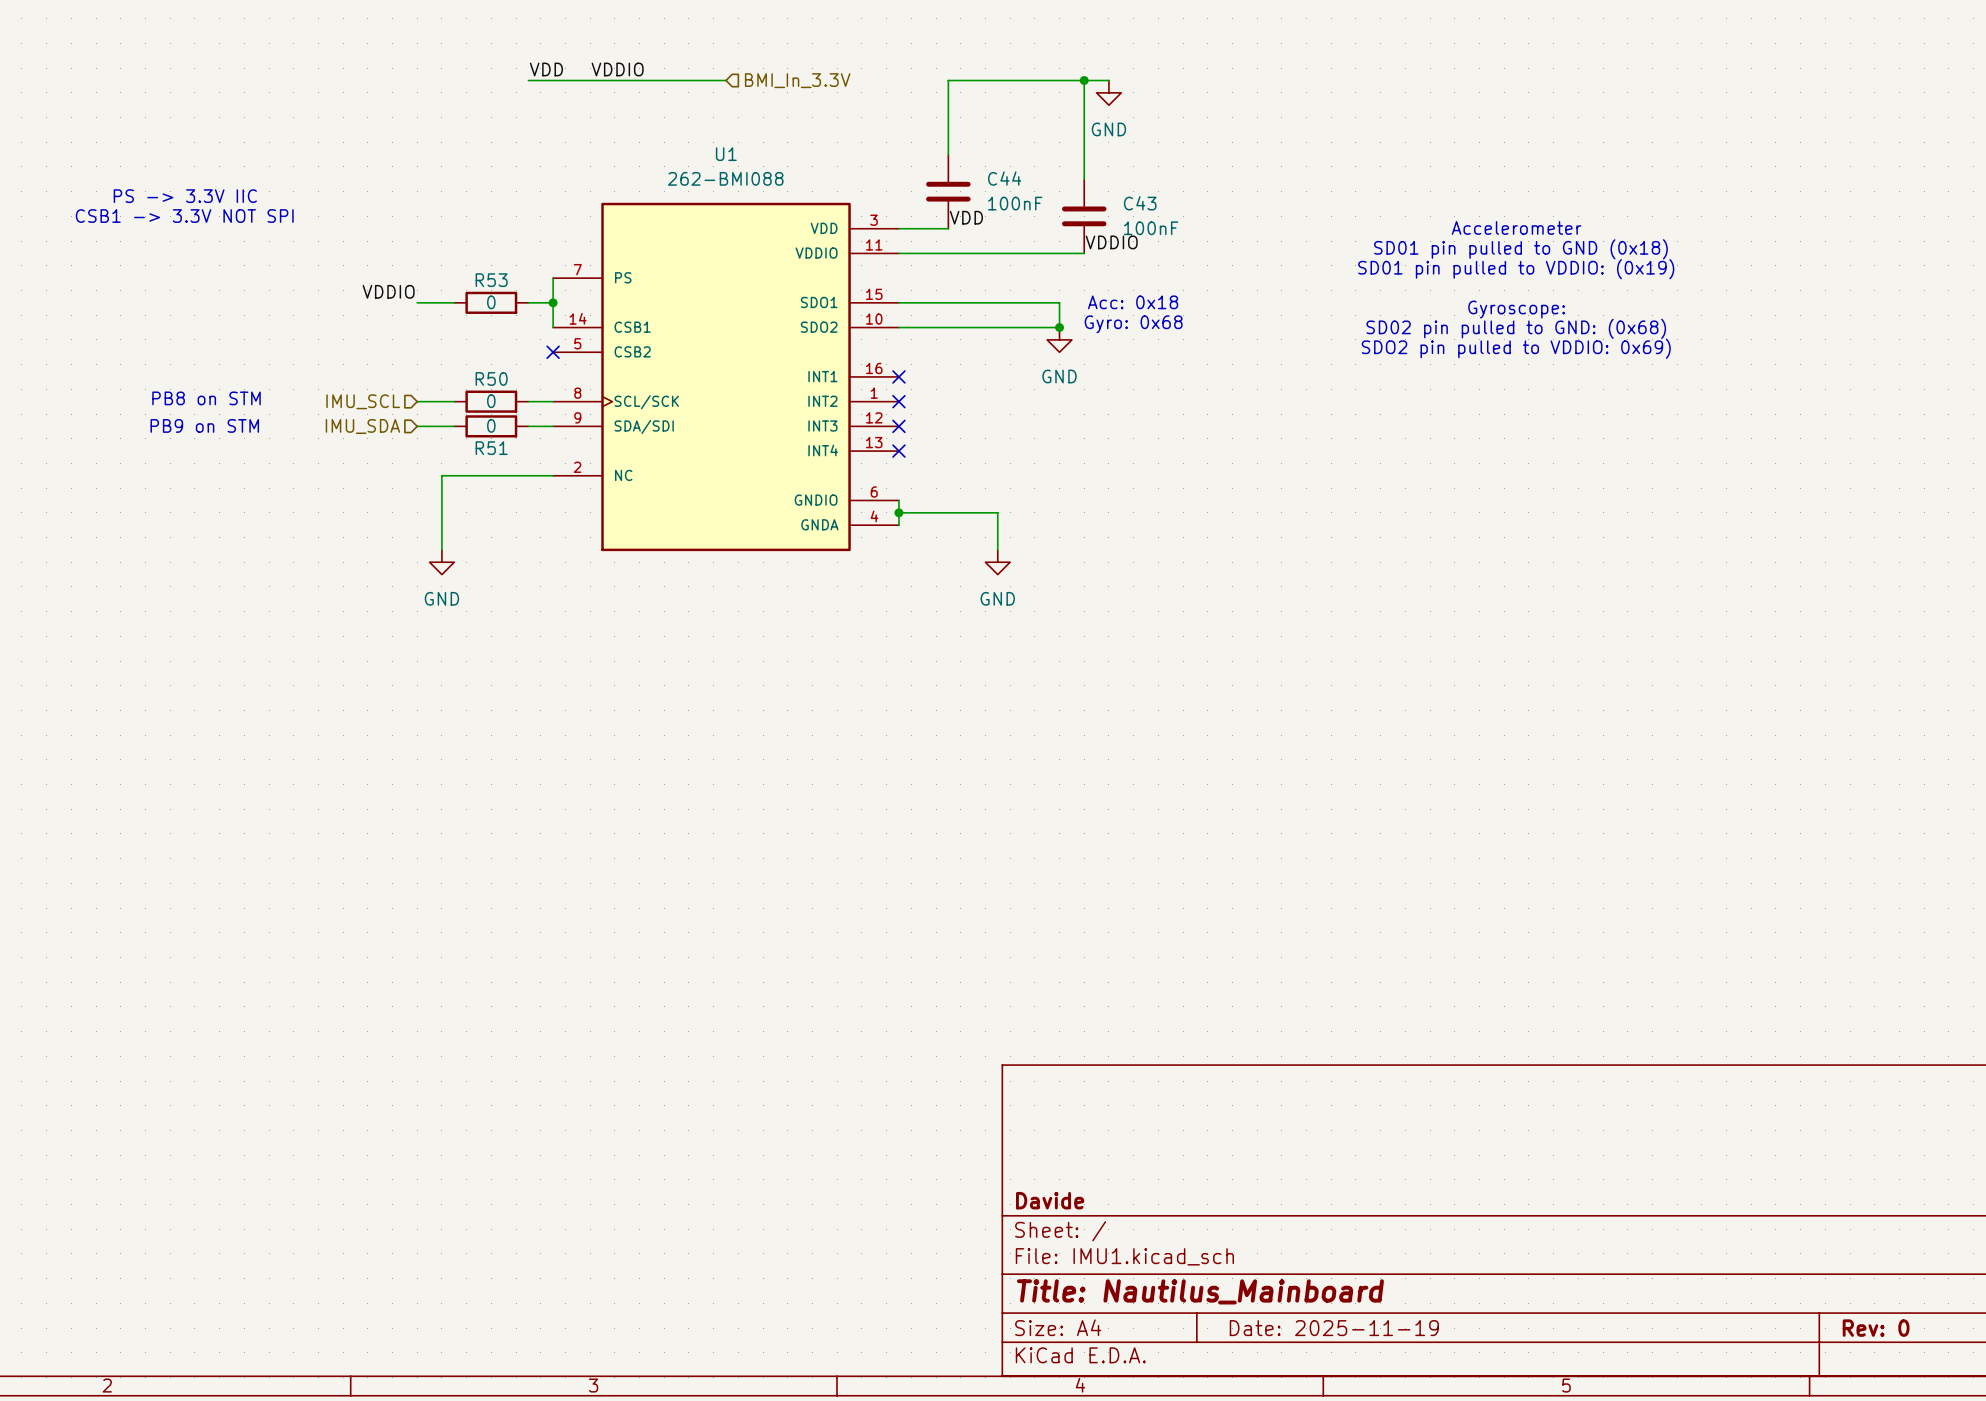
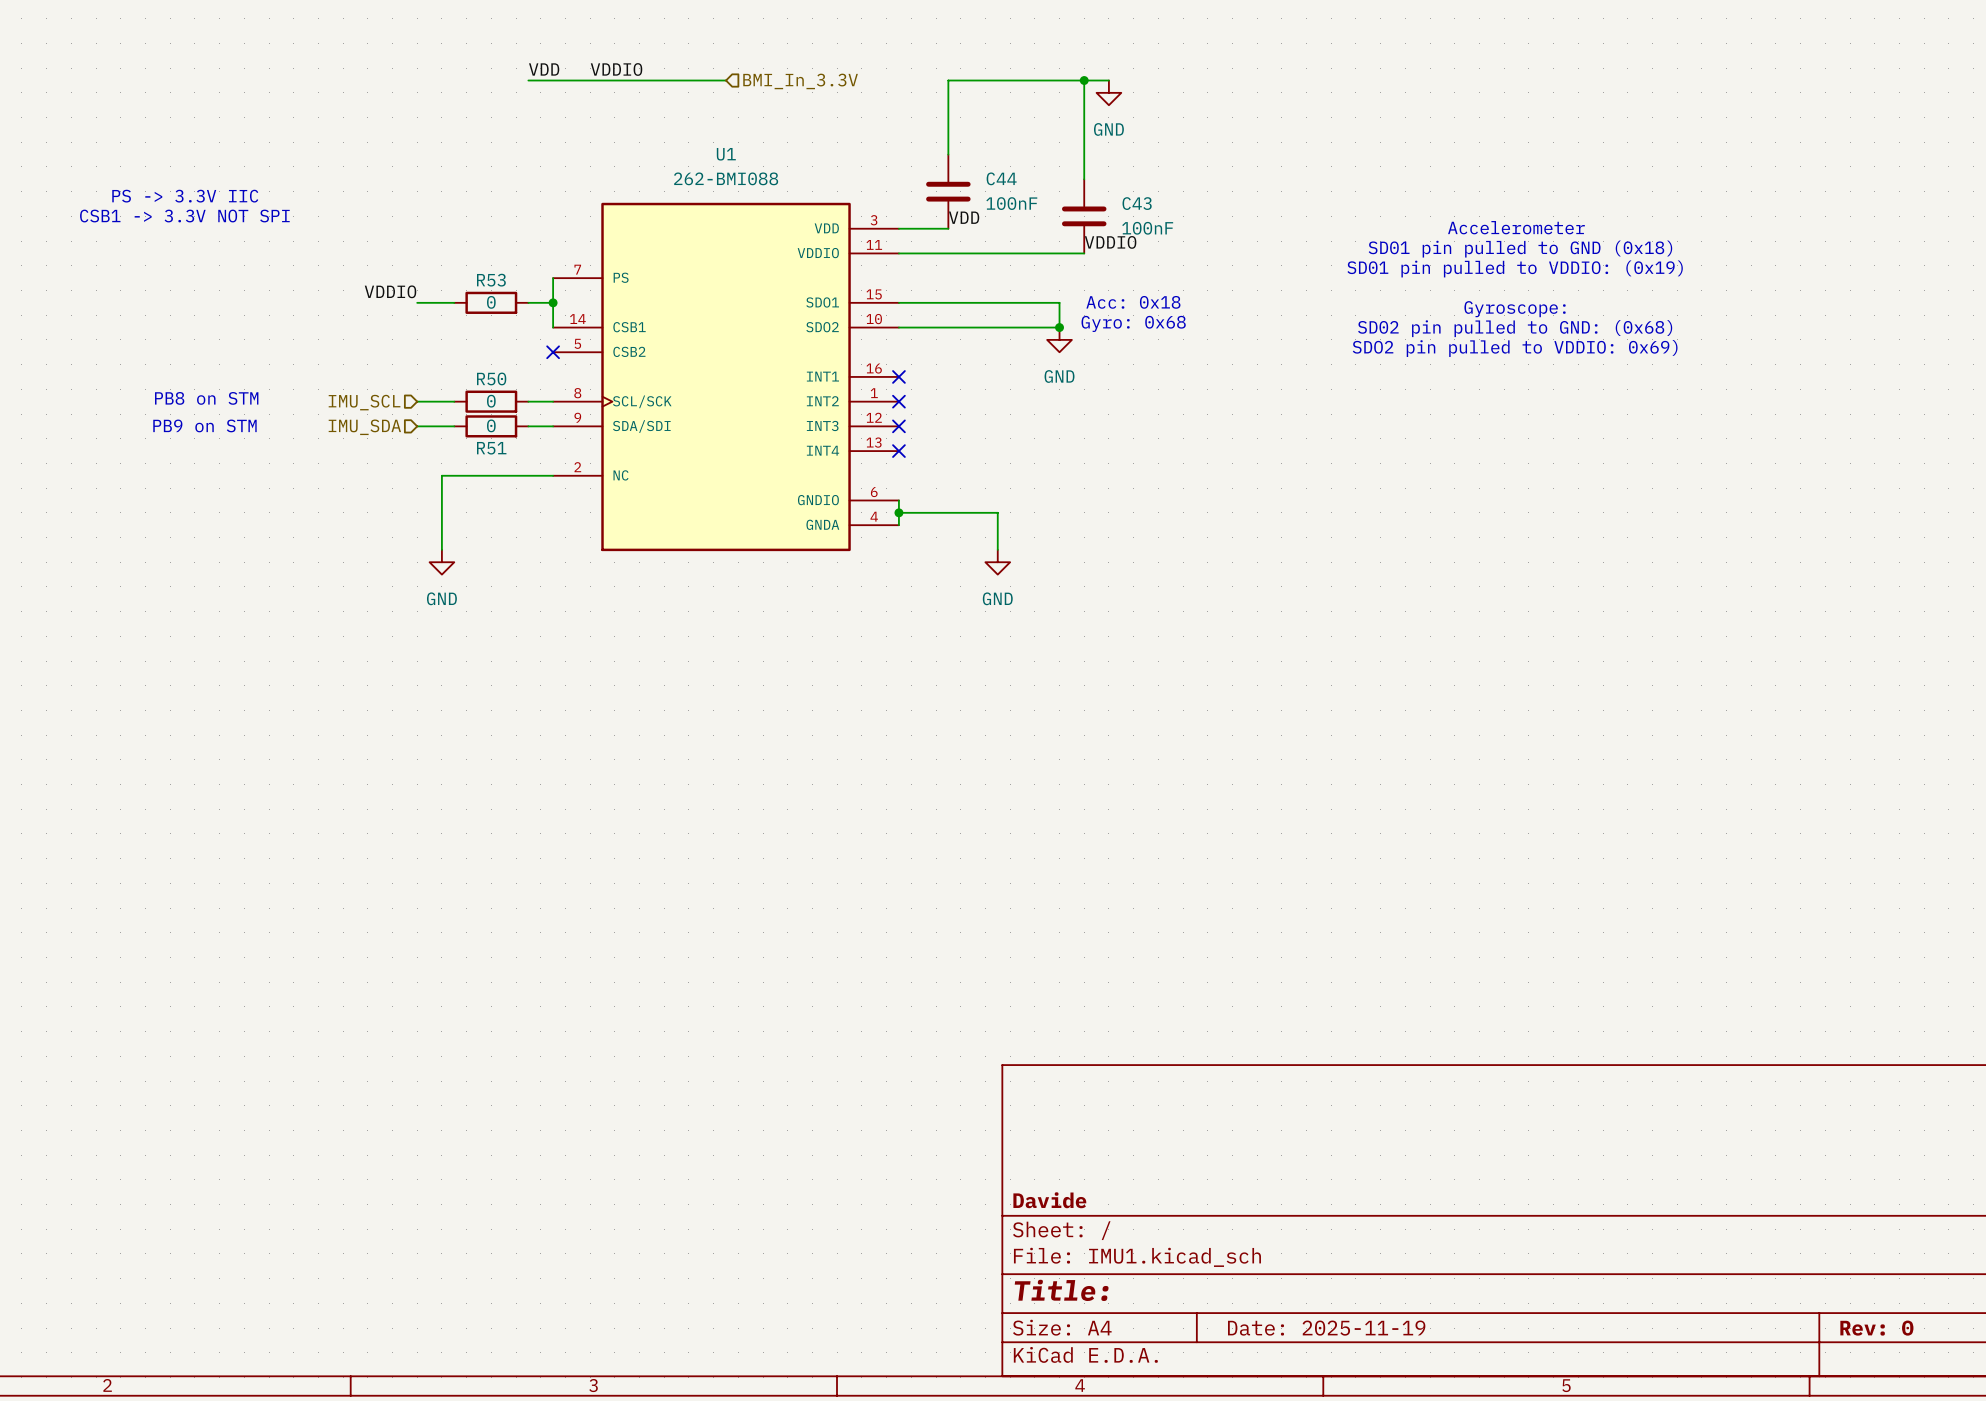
title block: Title: Nautilus_Mainboard (1200, 1291) -> Title: (1061, 1290)

